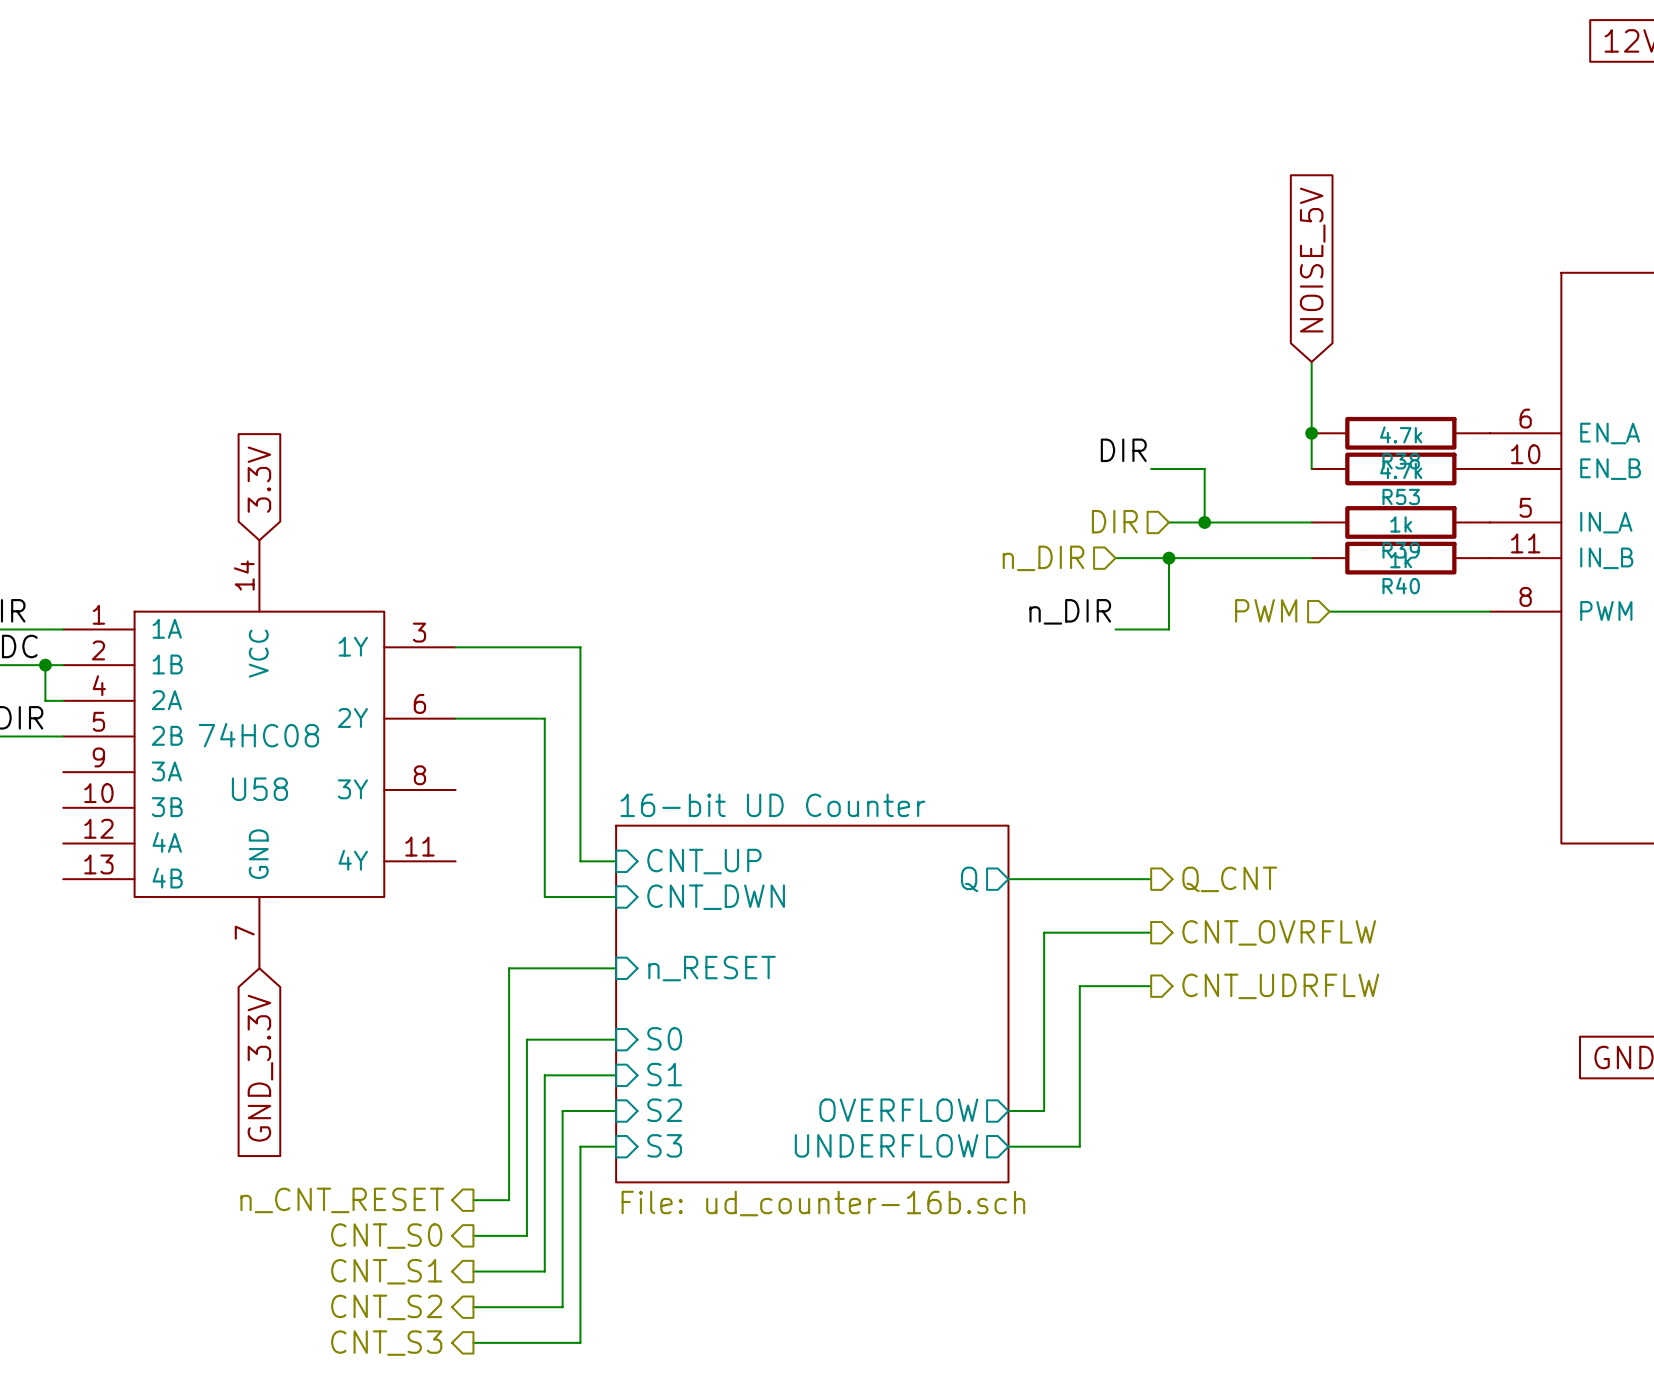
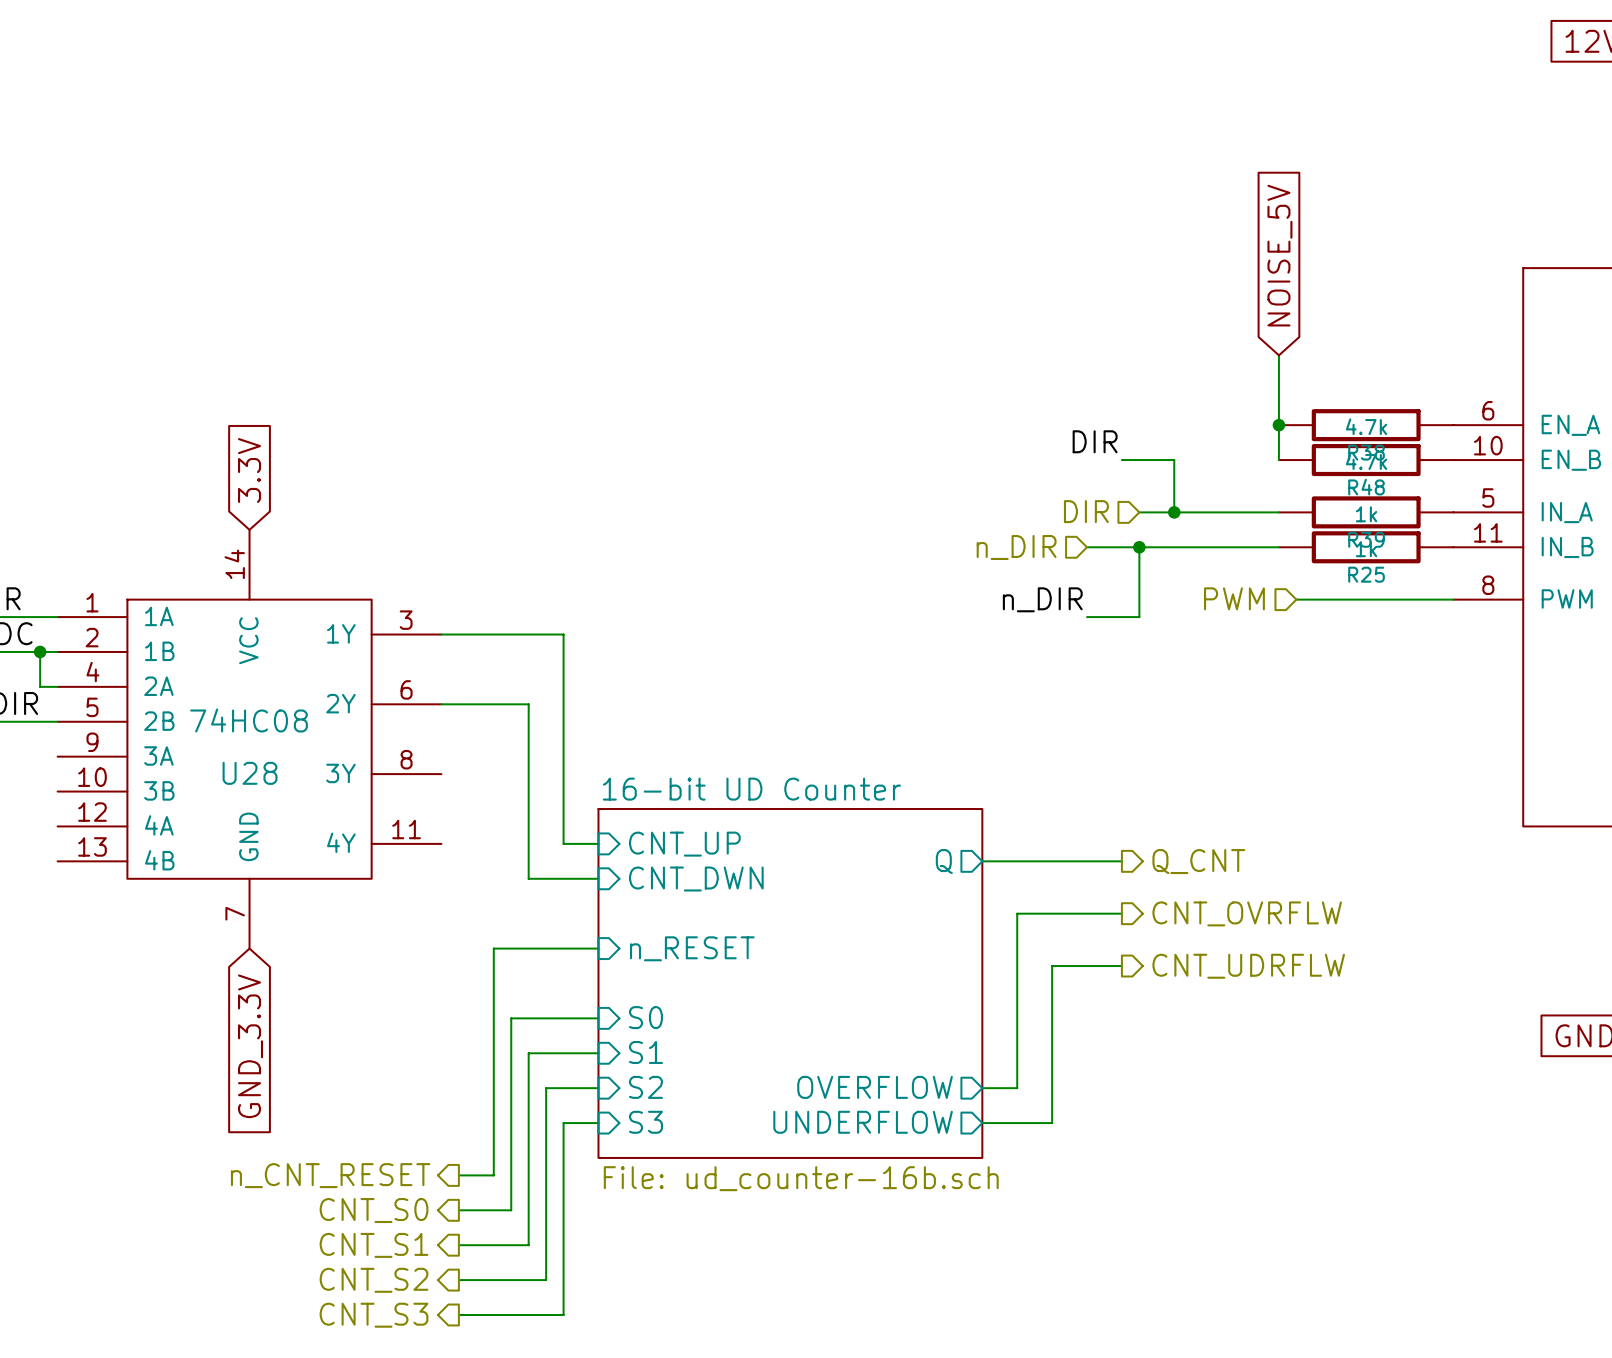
R53 name: R53 (1401, 496) -> R48 (1366, 487)
R40 name: R40 (1401, 585) -> R25 (1366, 574)
U58 name: U58 (259, 789) -> U28 (250, 773)

